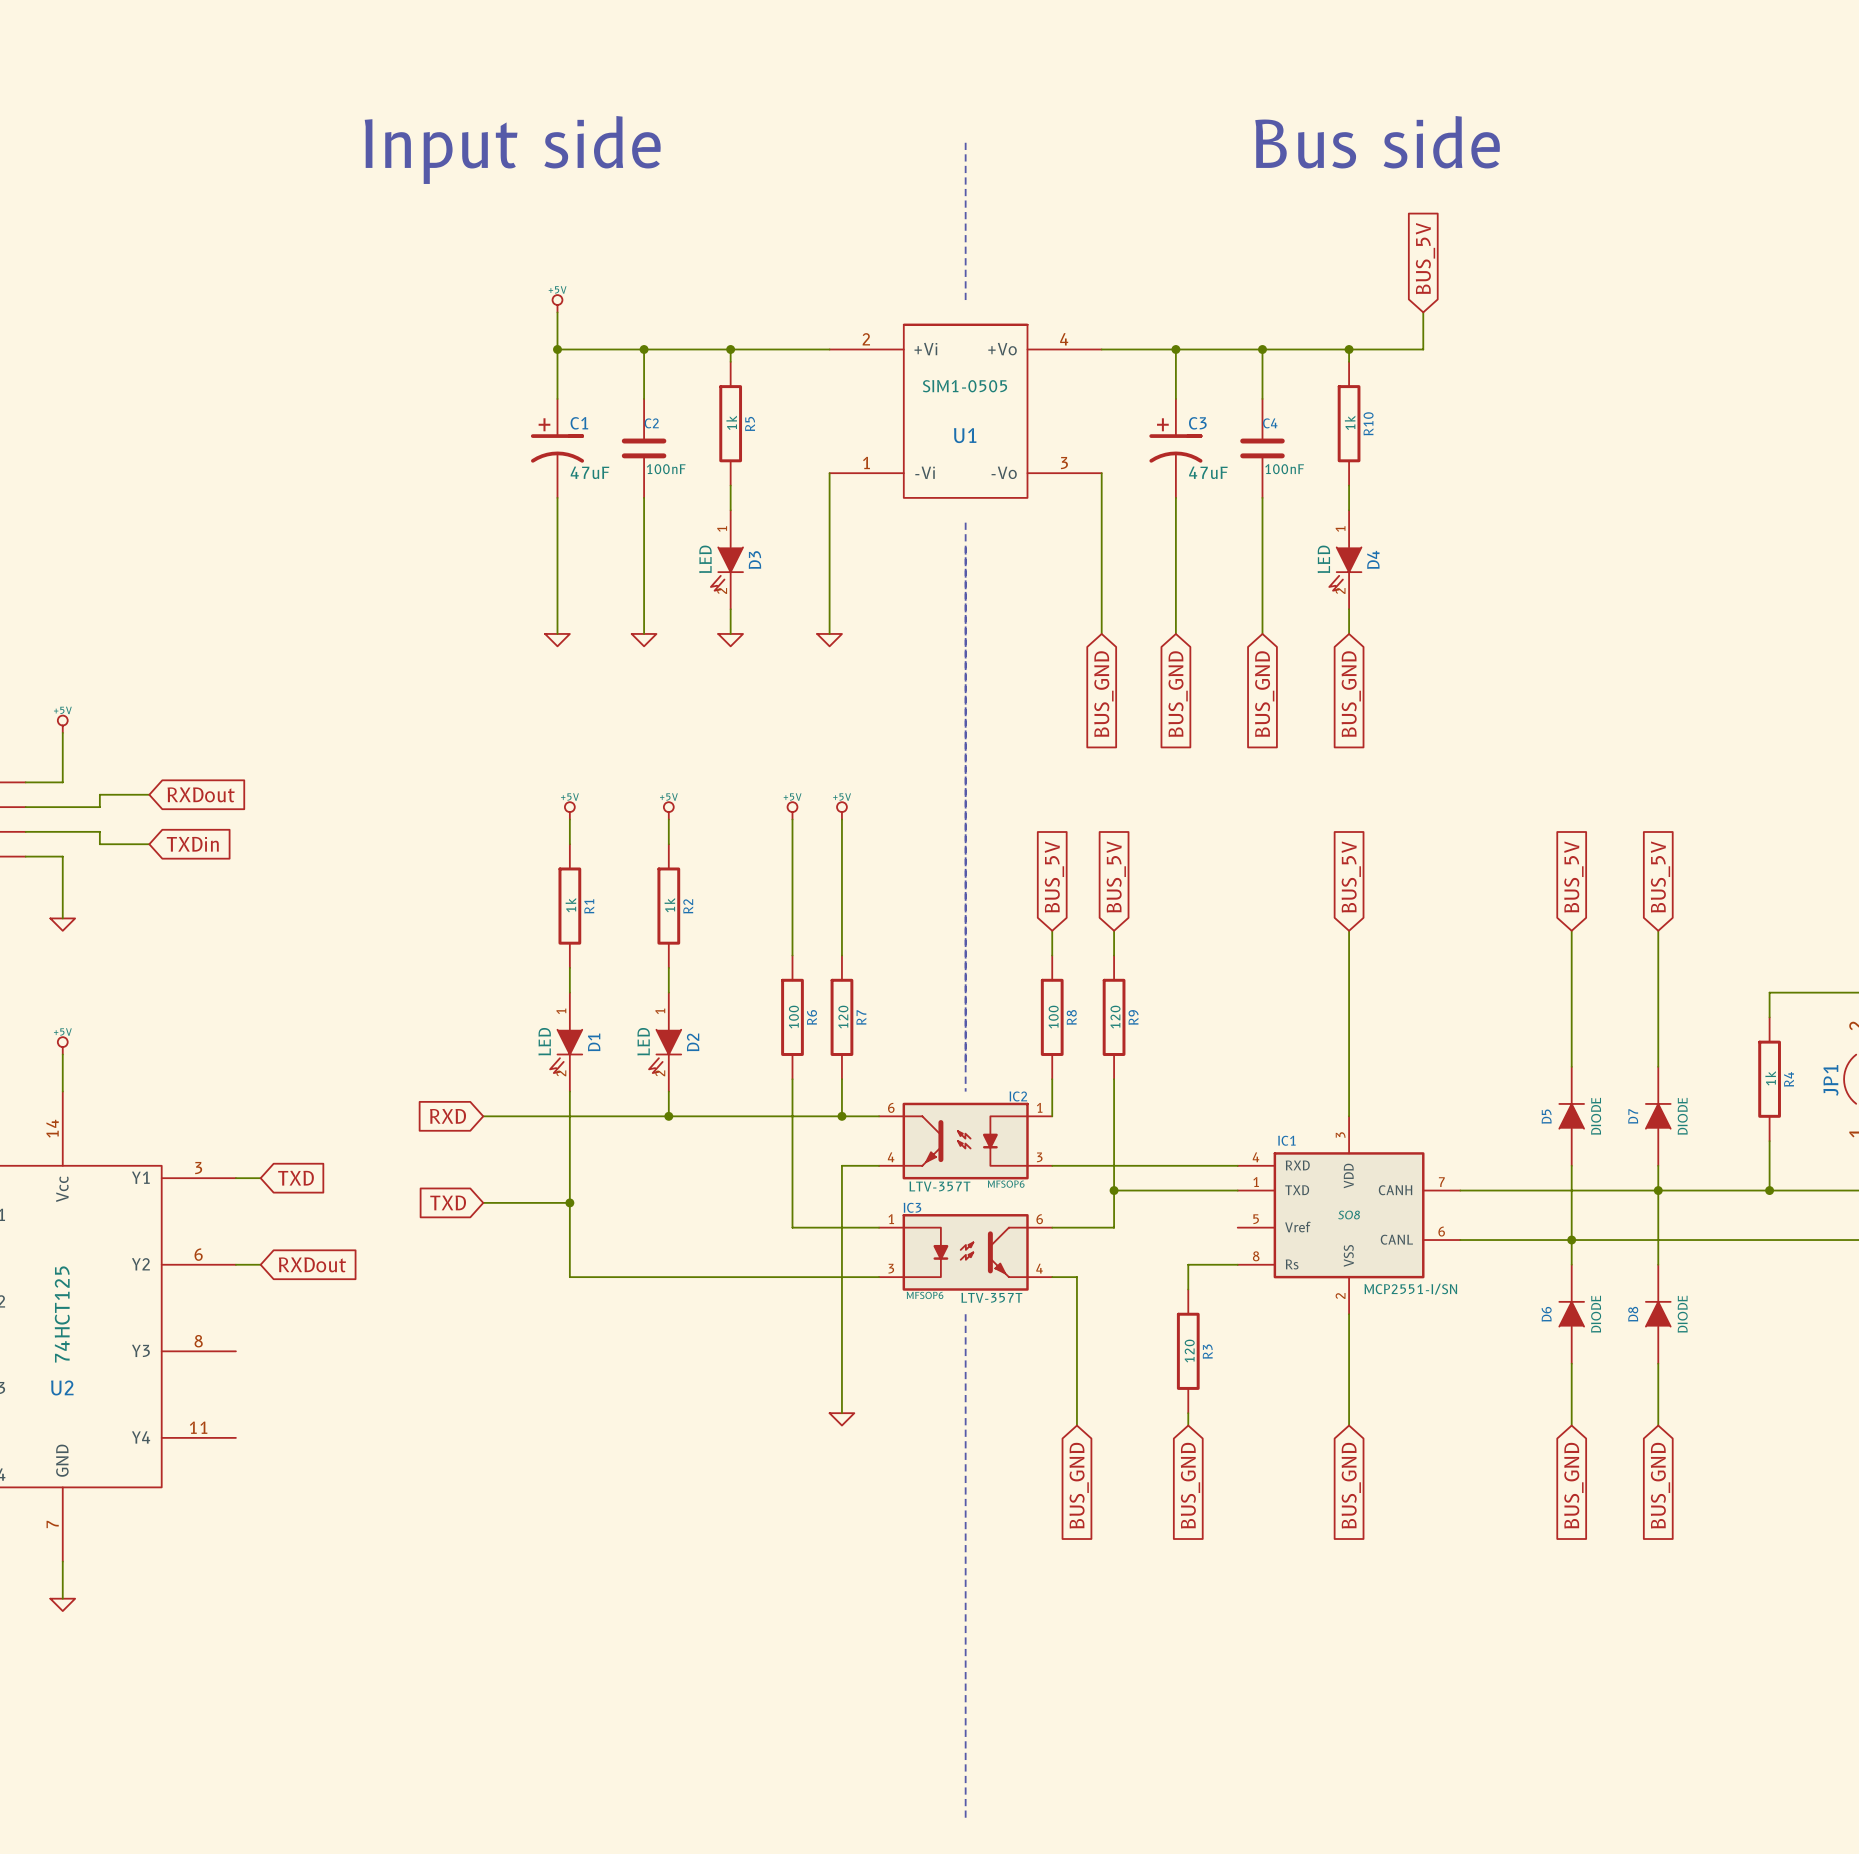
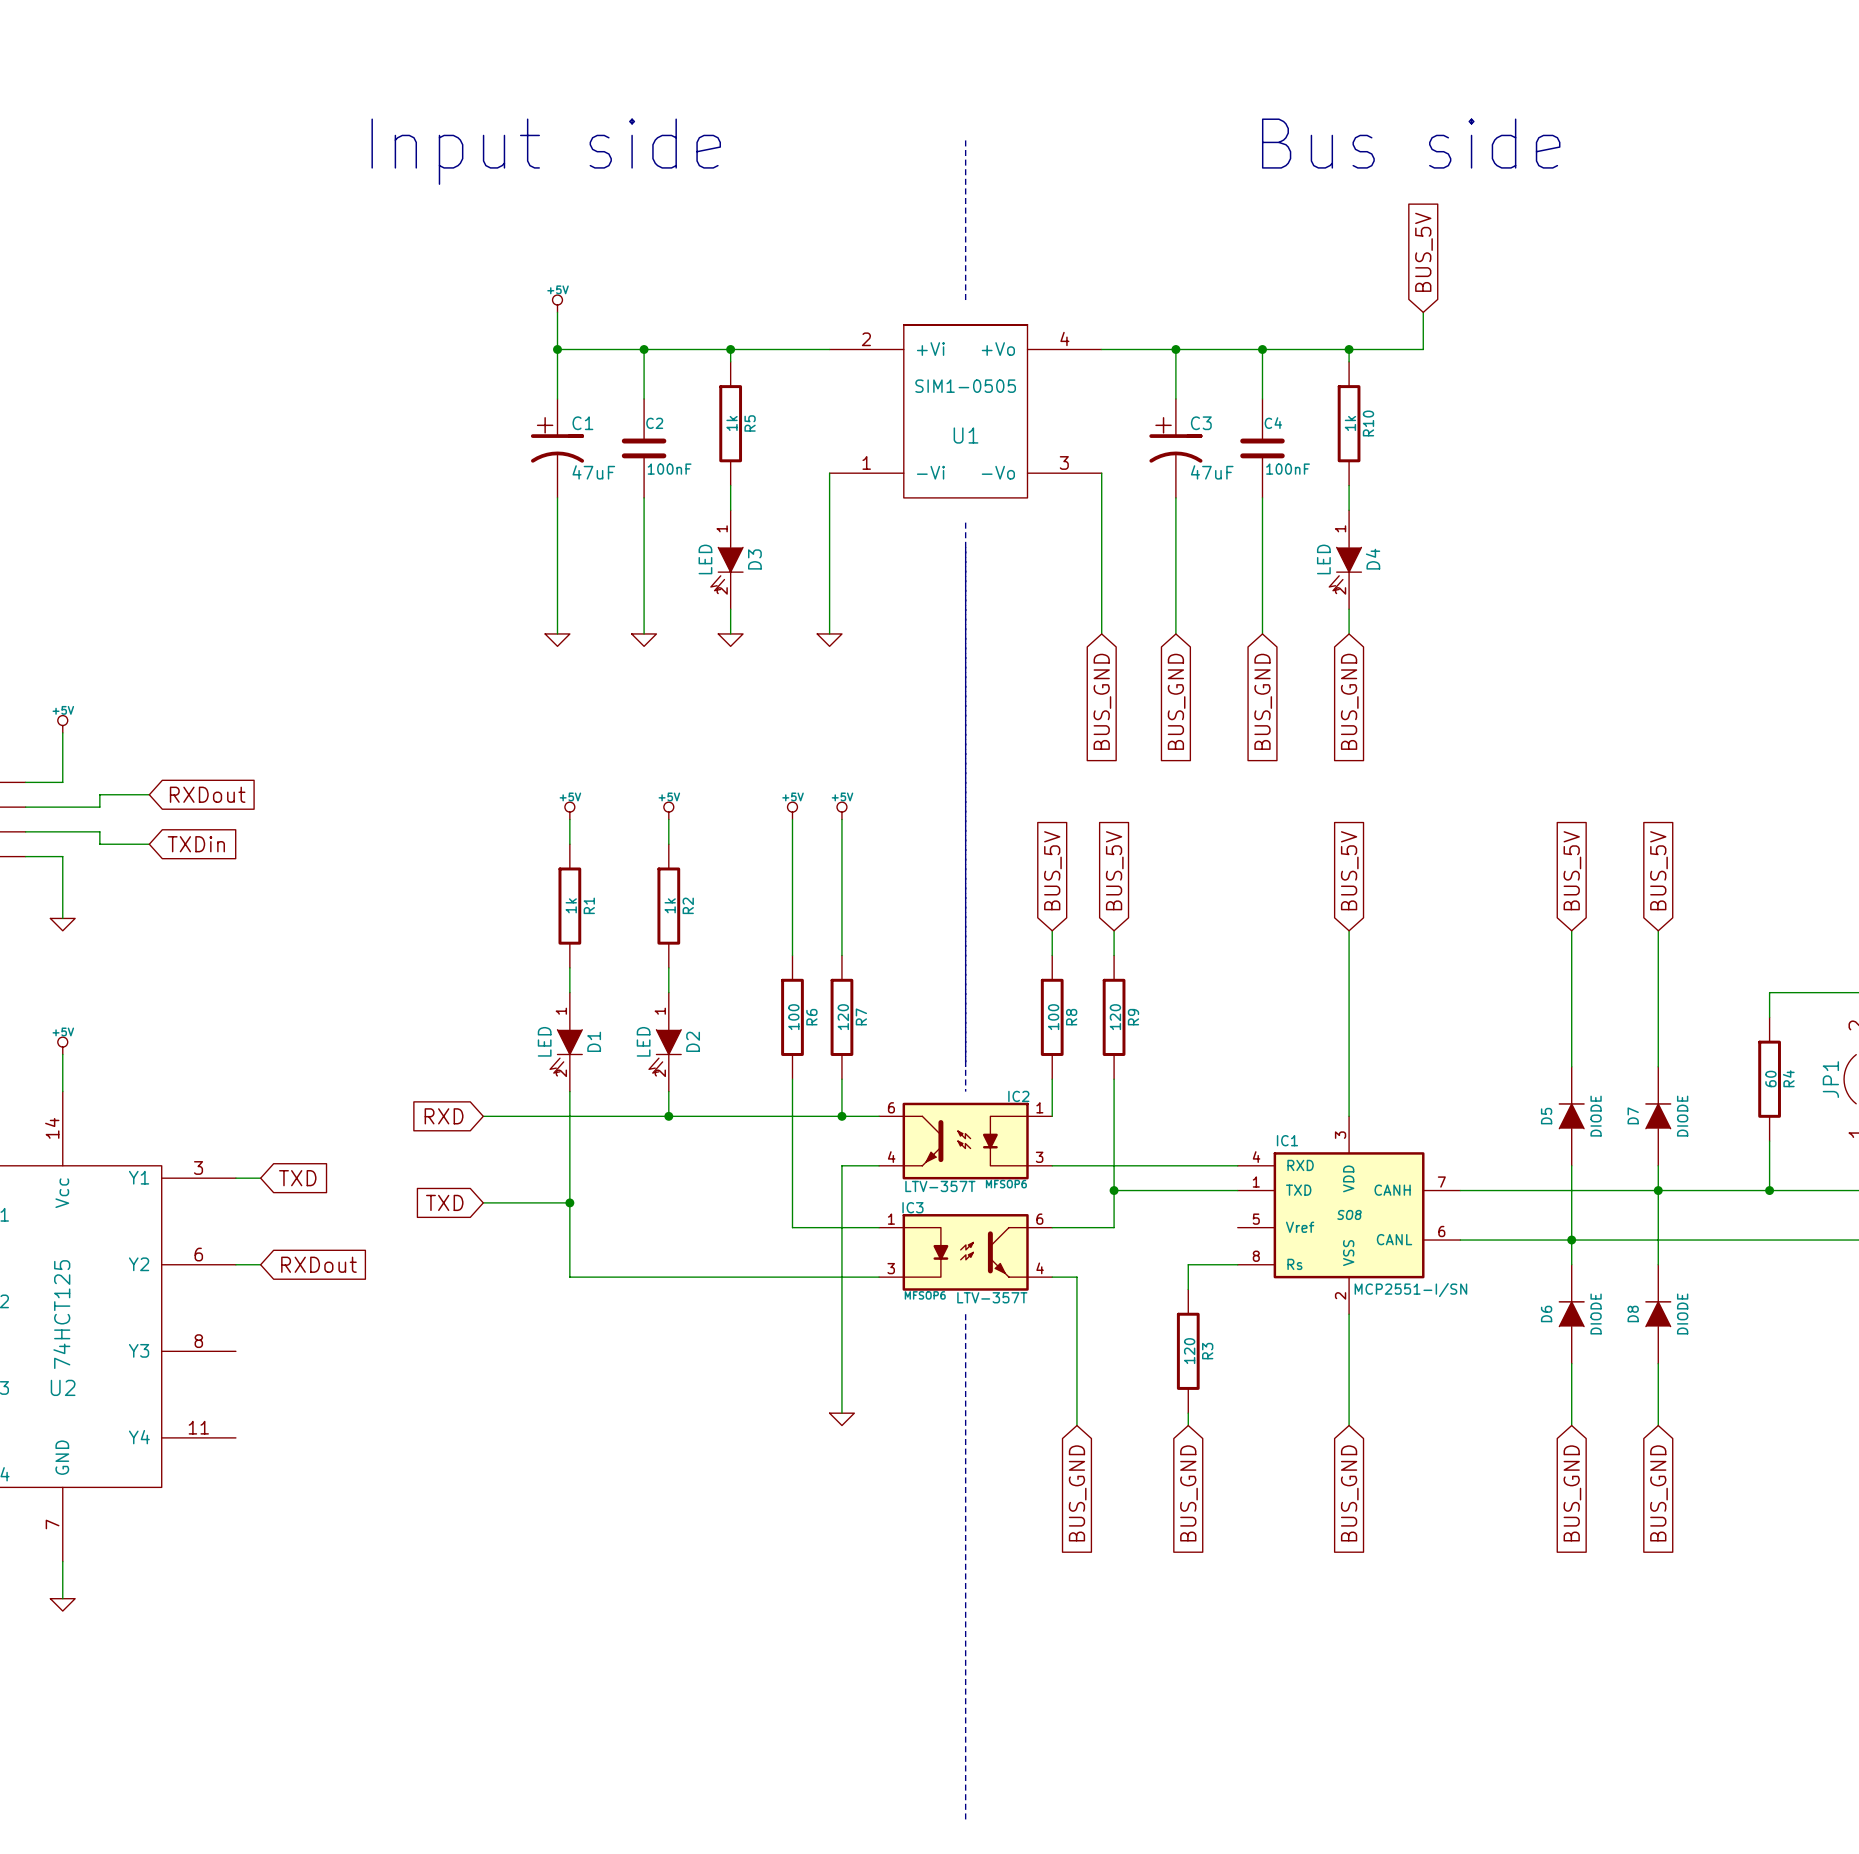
R4 value: 1k (1770, 1078) -> 60 (1770, 1078)

